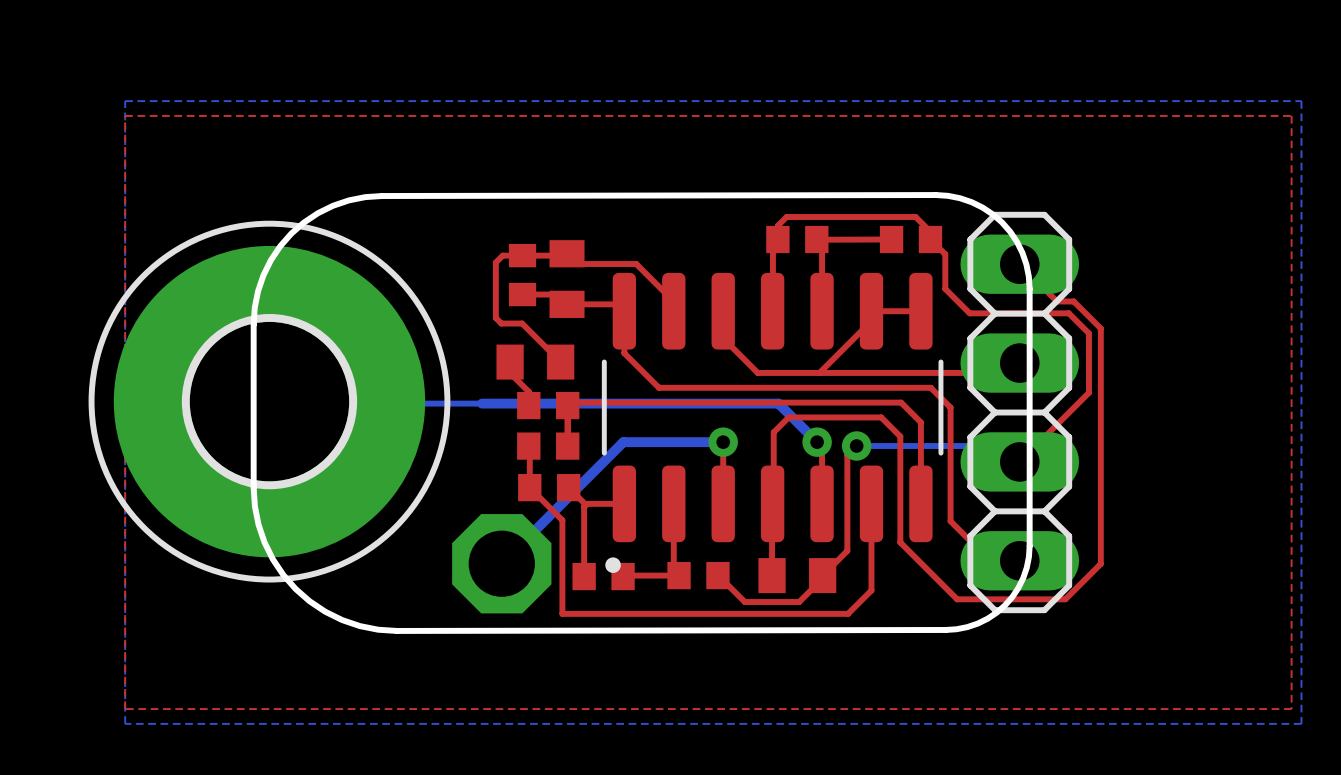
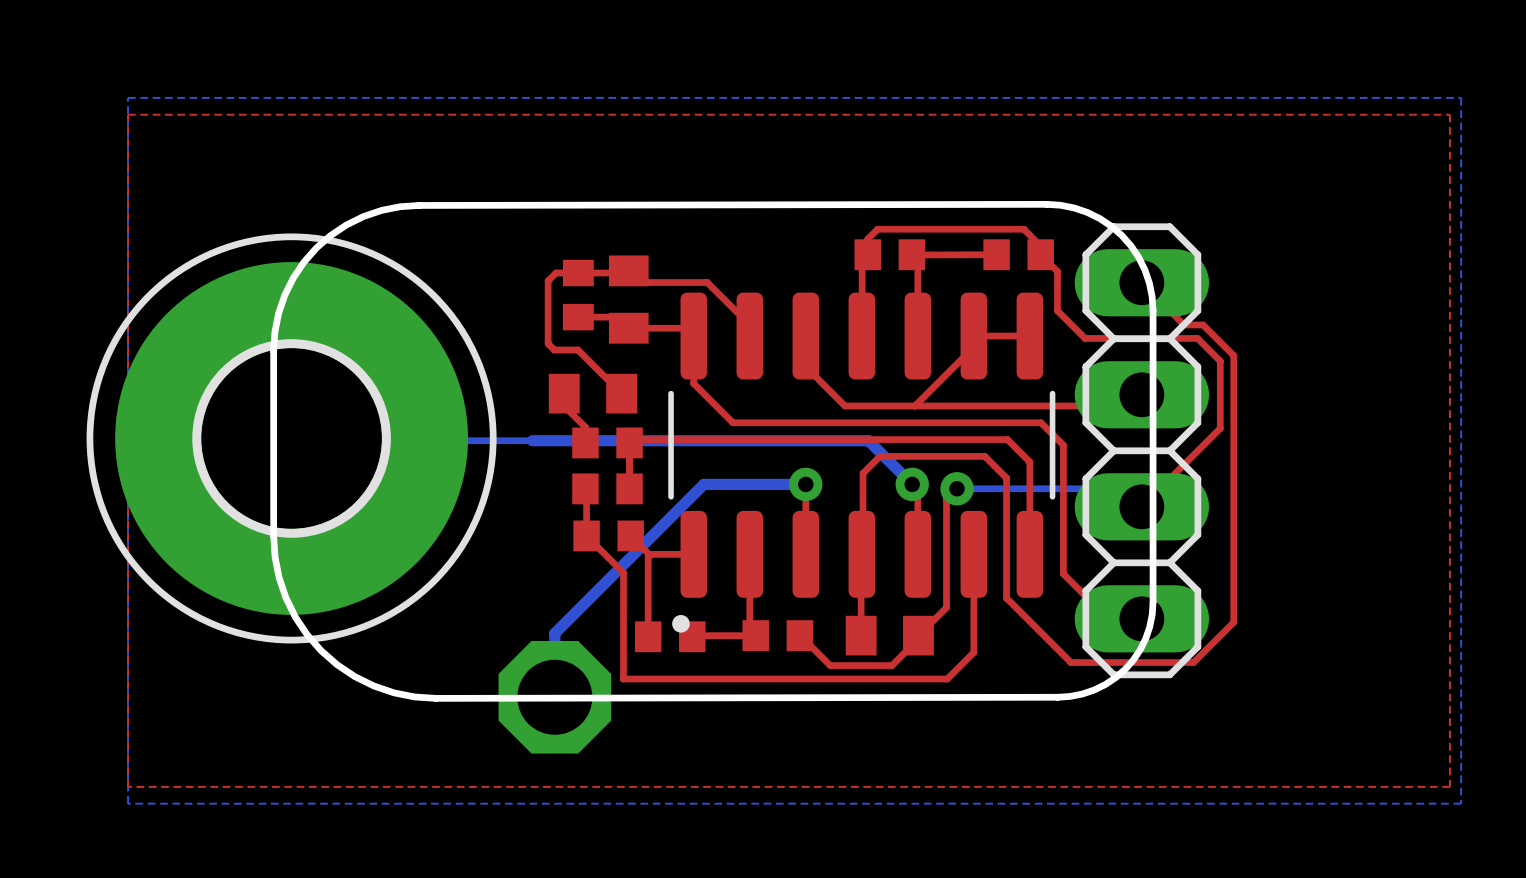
bottom track: (633, 442) (623, 442) (501, 563) -> (703, 484) (554, 633) (554, 697)
part position: (501, 563) -> (554, 697)

